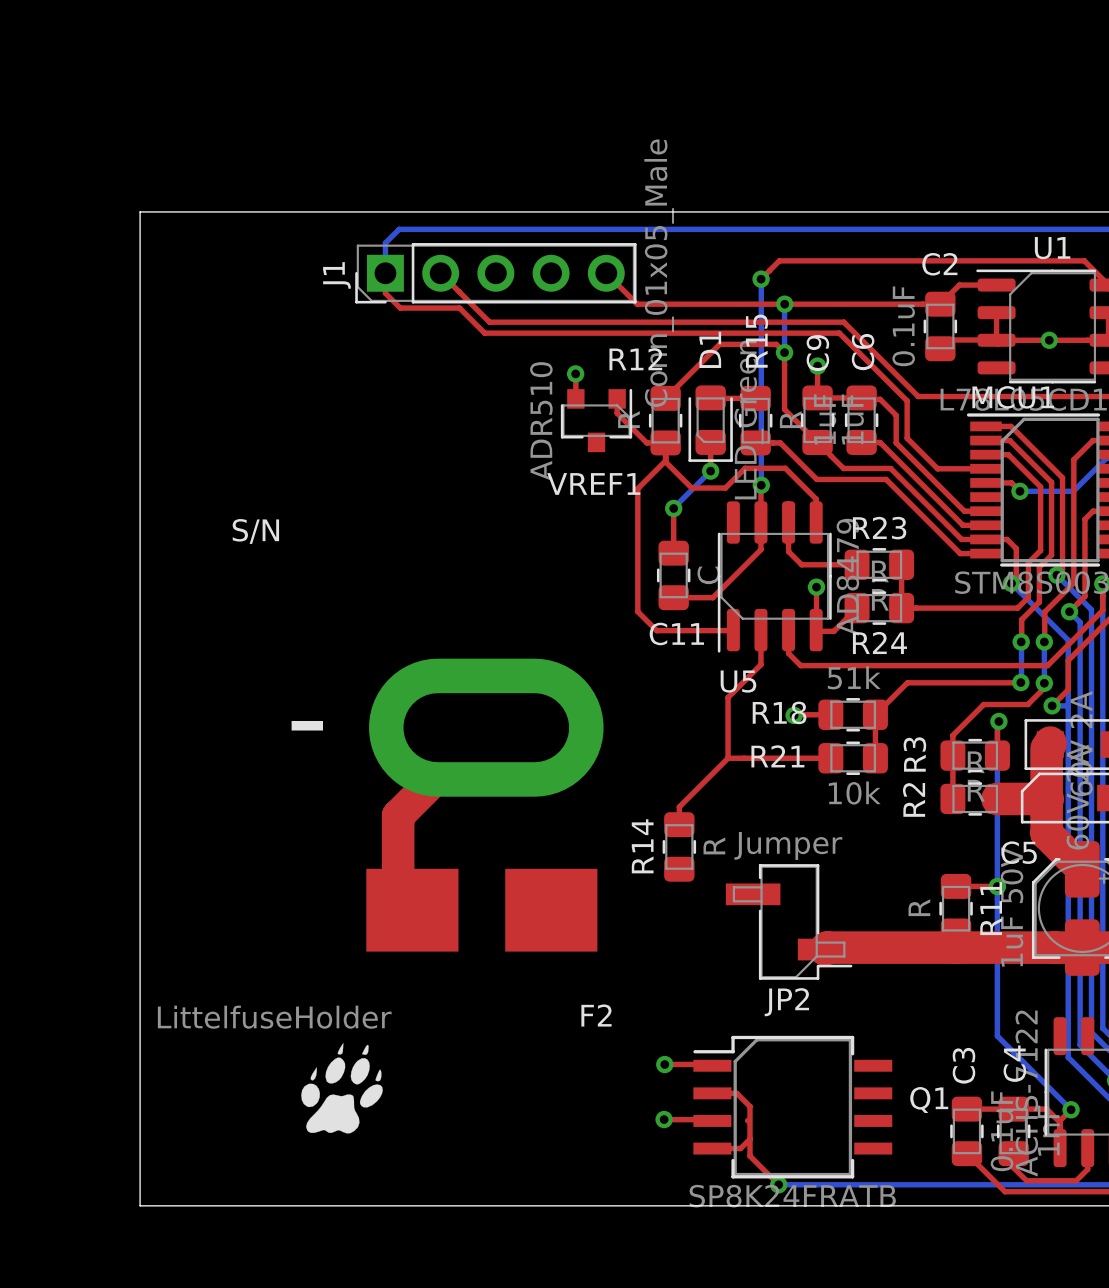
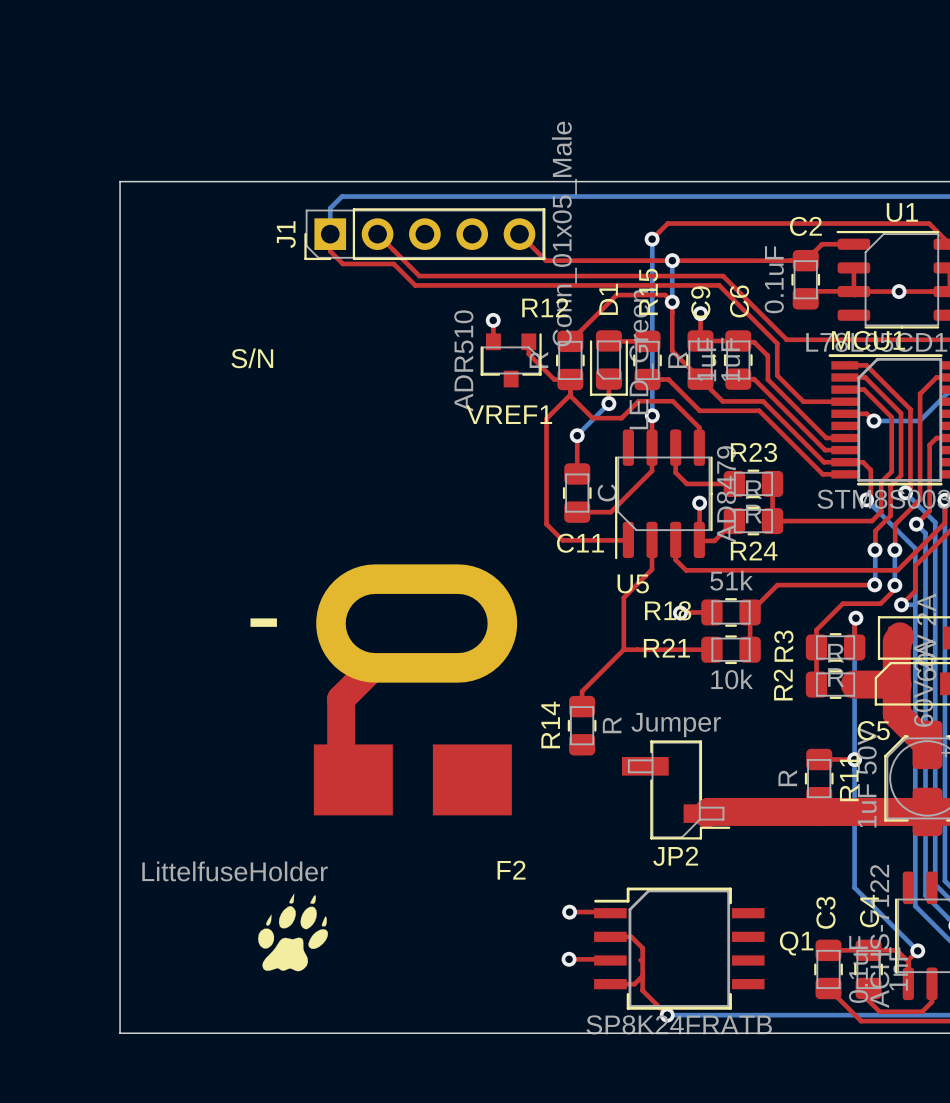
text position: S/N (255, 531) -> S/N (252, 358)

